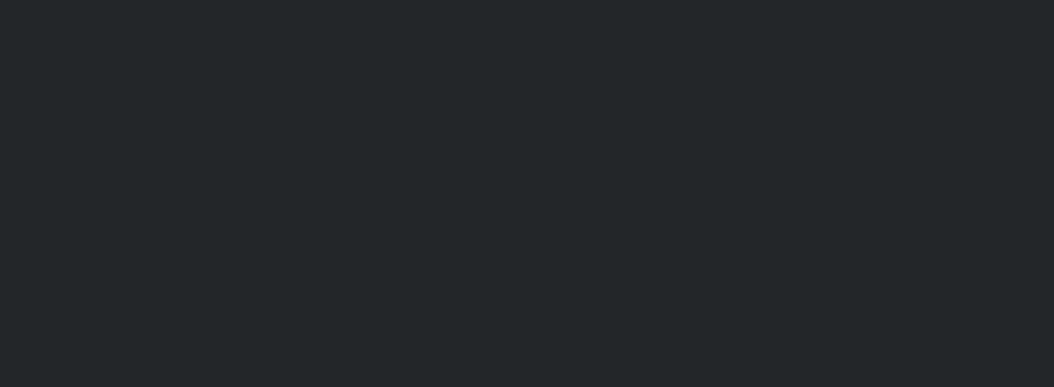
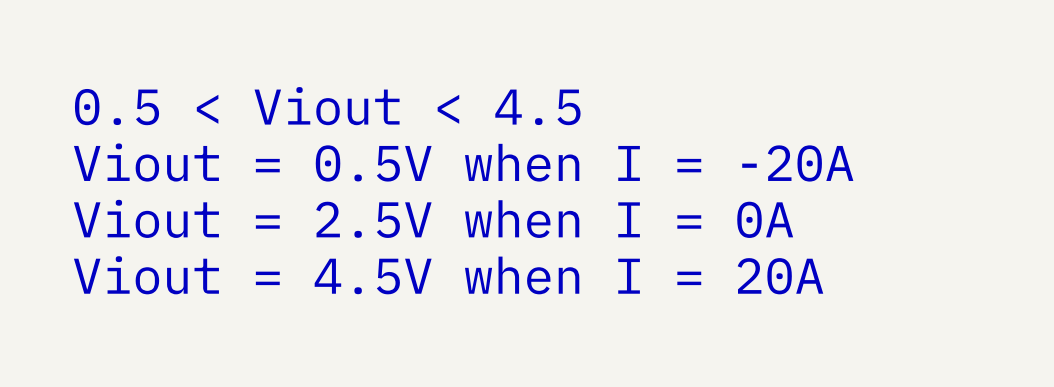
text: none -> 0.5 < Viout < 4.5 (327, 106)
text: none -> Viout = 0.5V when I = -20A (463, 162)
text: none -> Viout = 2.5V when I = 0A (433, 218)
text: none -> Viout = 4.5V when I = 20A (448, 275)

